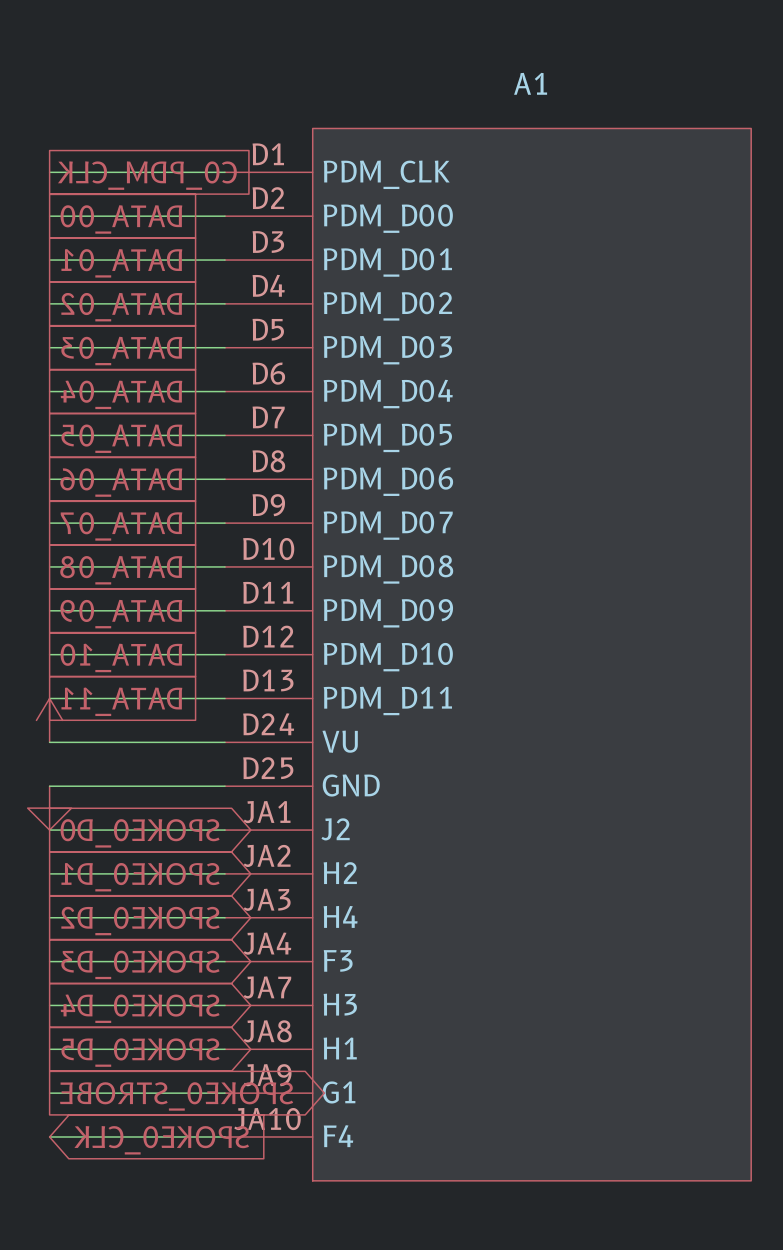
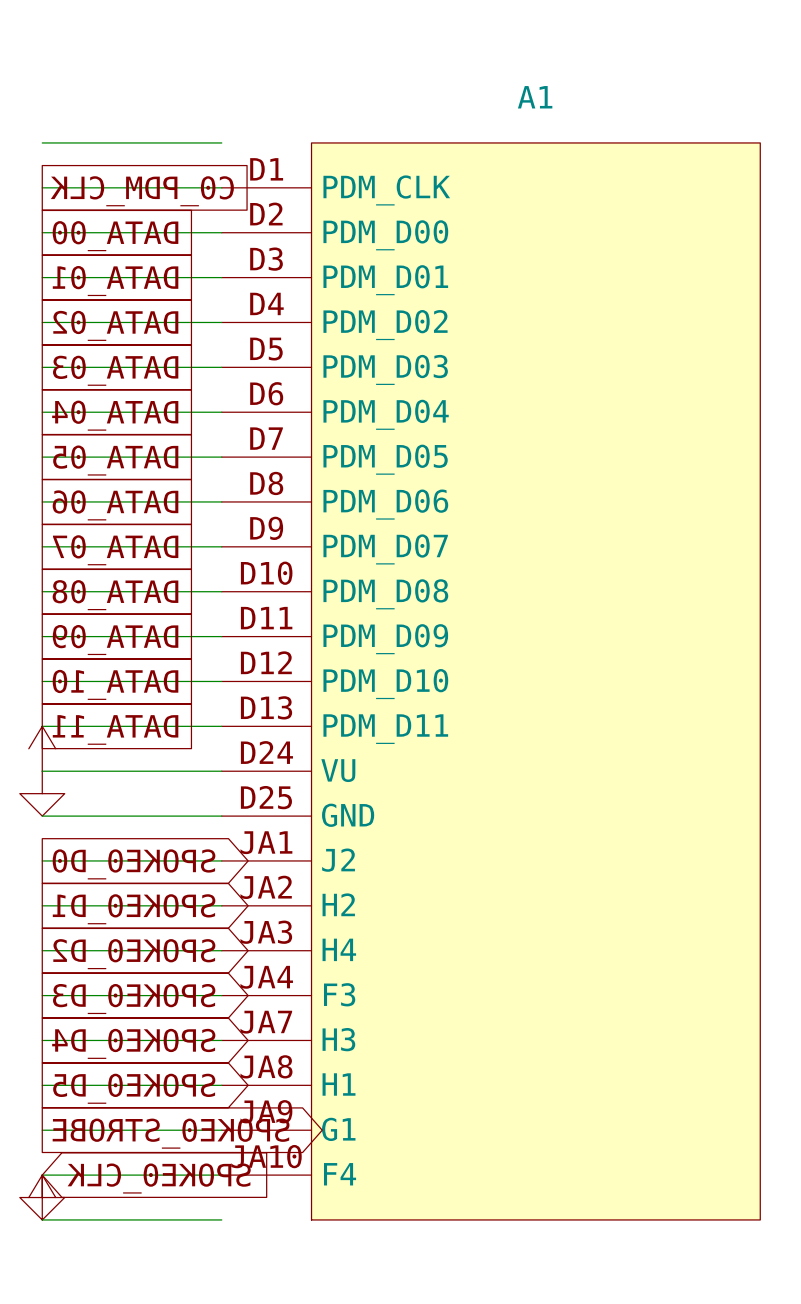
wire: none -> (42, 142) (221, 142)
power symbol position: (49, 808) -> (42, 793)
power symbol: none -> (42, 1197)
power symbol: none -> (42, 1197)
wire: none -> (42, 1219) (221, 1219)

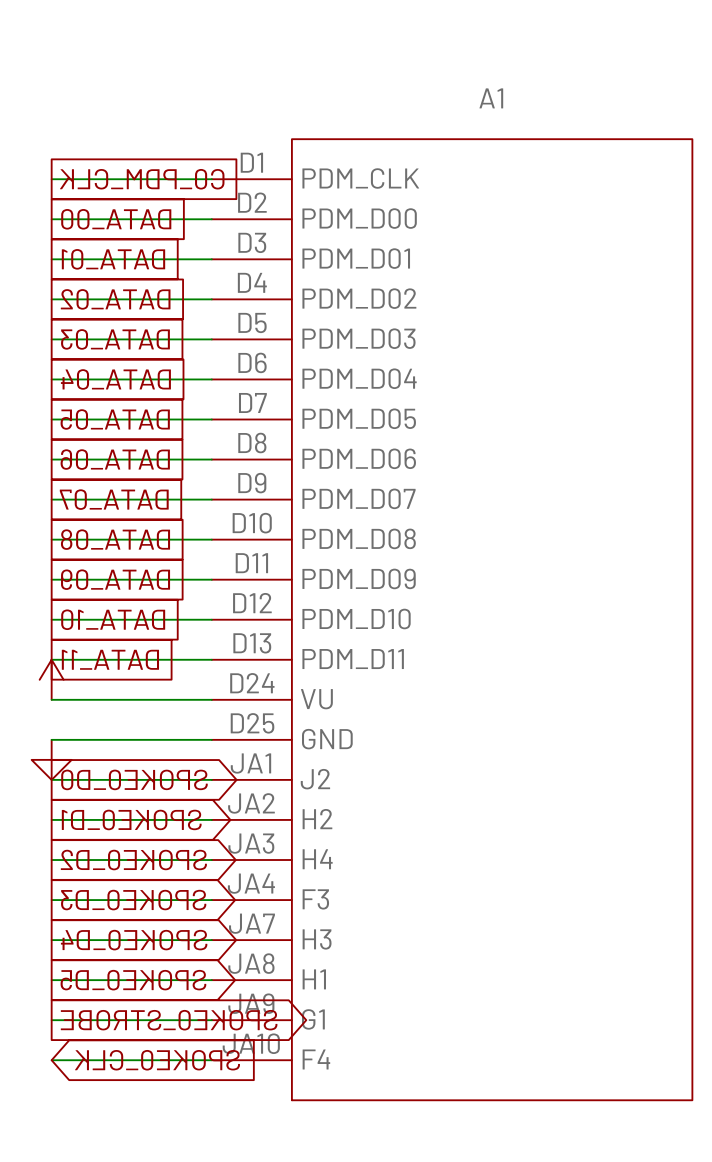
wire: (42, 142) (221, 142) -> none
power symbol position: (42, 793) -> (51, 759)
power symbol: (42, 1197) -> none
power symbol: (42, 1197) -> none
wire: (42, 1219) (221, 1219) -> none

